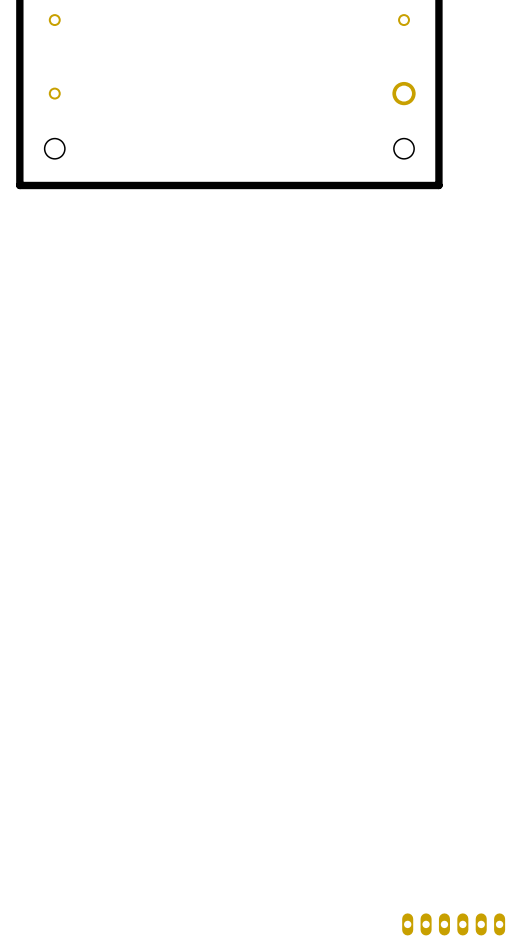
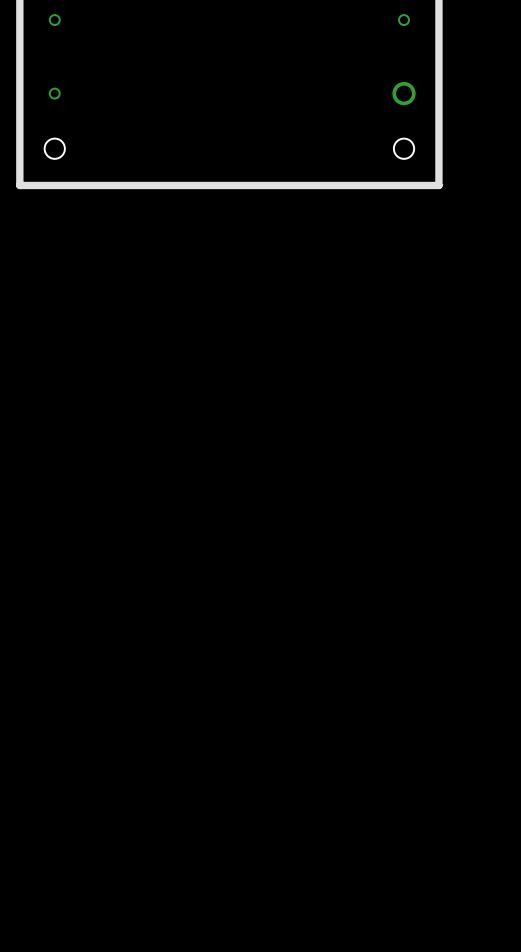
part: (453, 924) -> none

